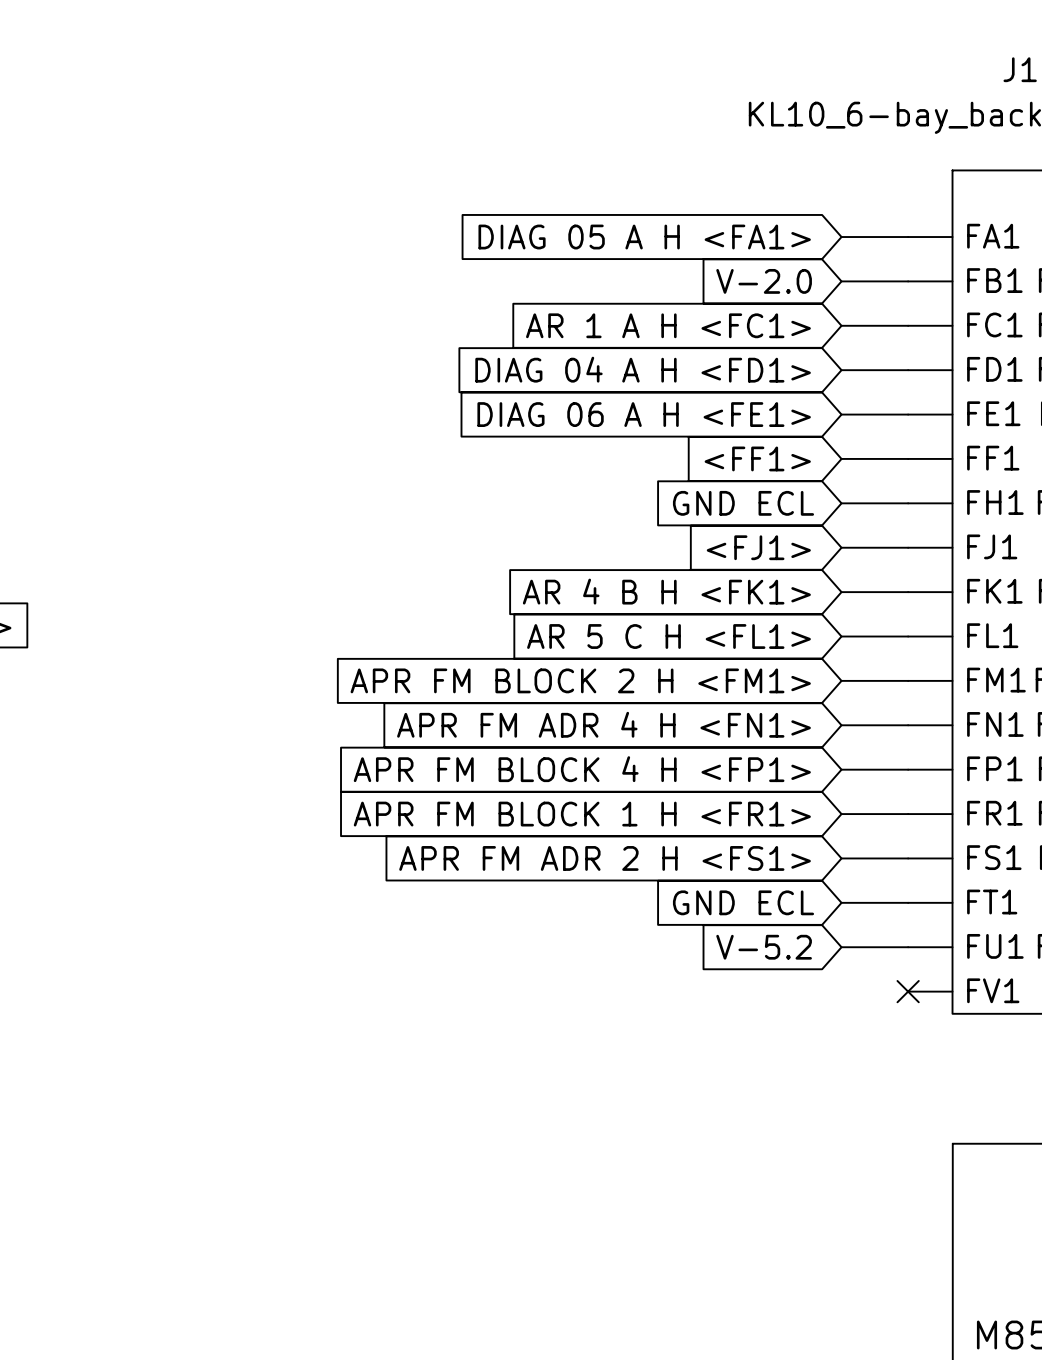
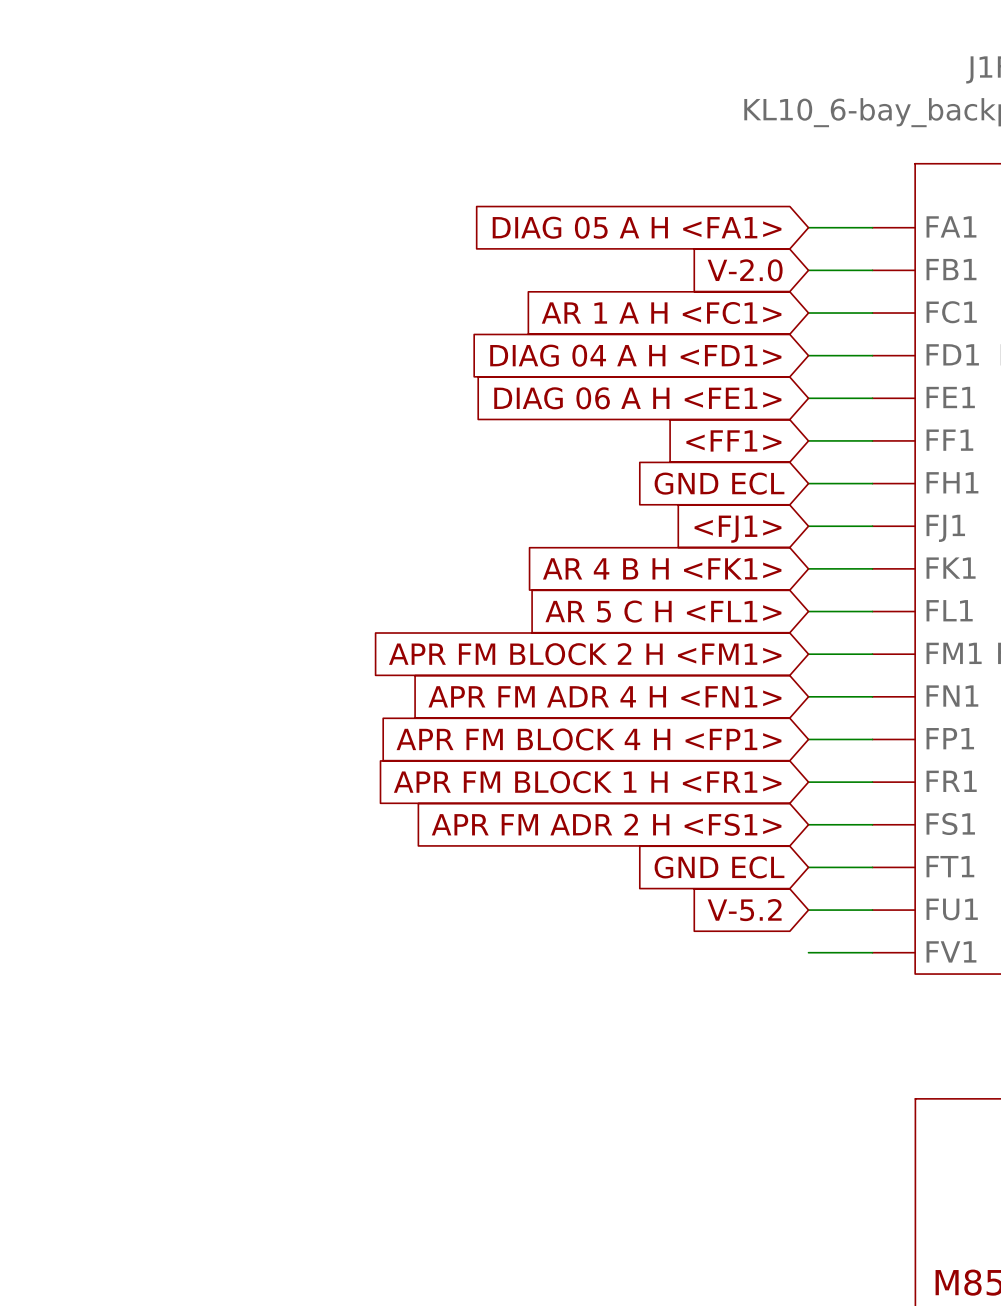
wire: none -> (808, 952) (872, 952)
no-connect mark: (908, 991) -> none

